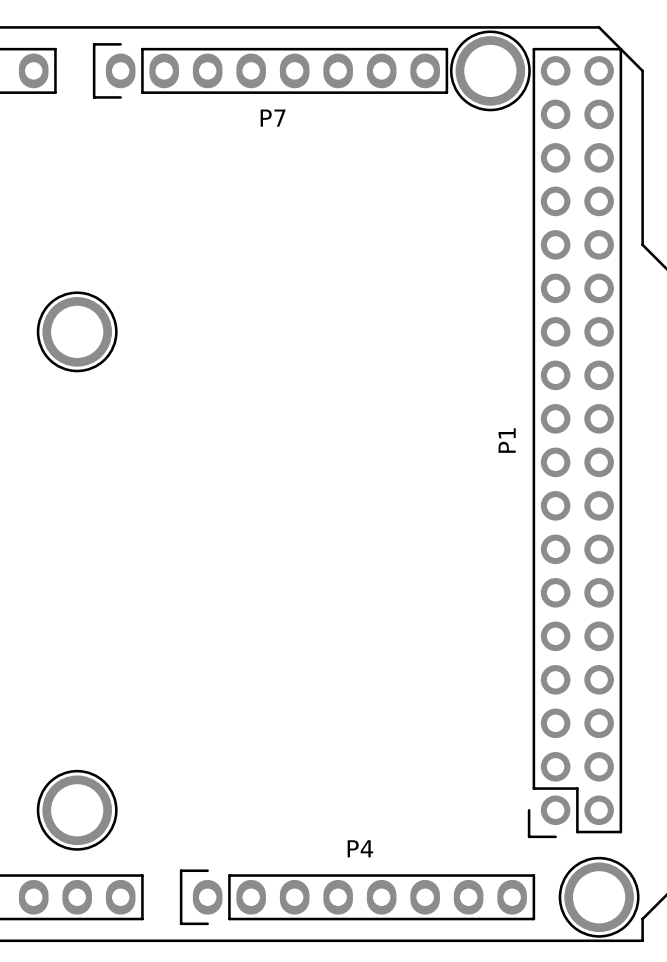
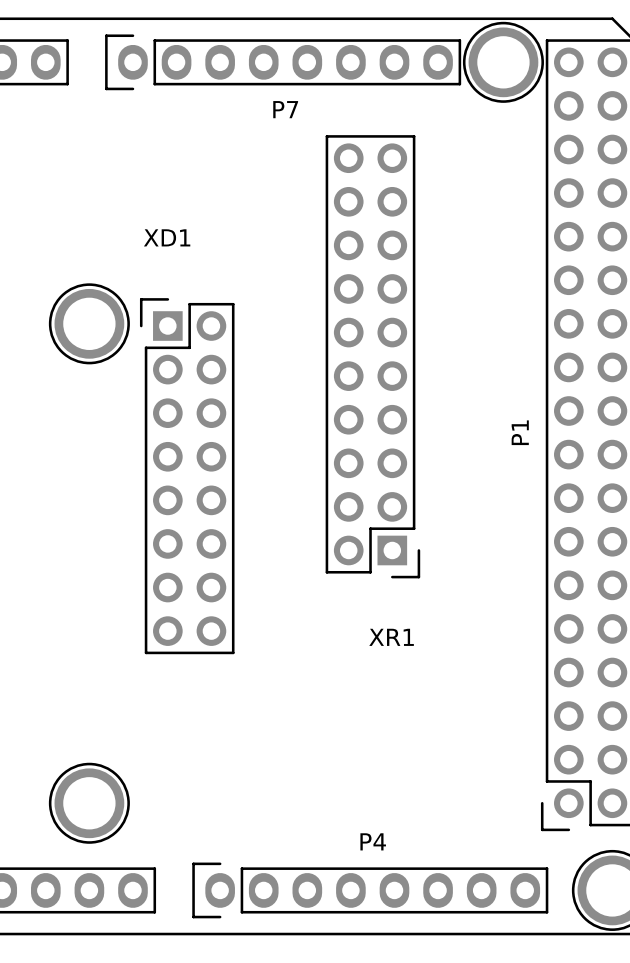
XR1: none -> (372, 356)
XD1: none -> (187, 476)

